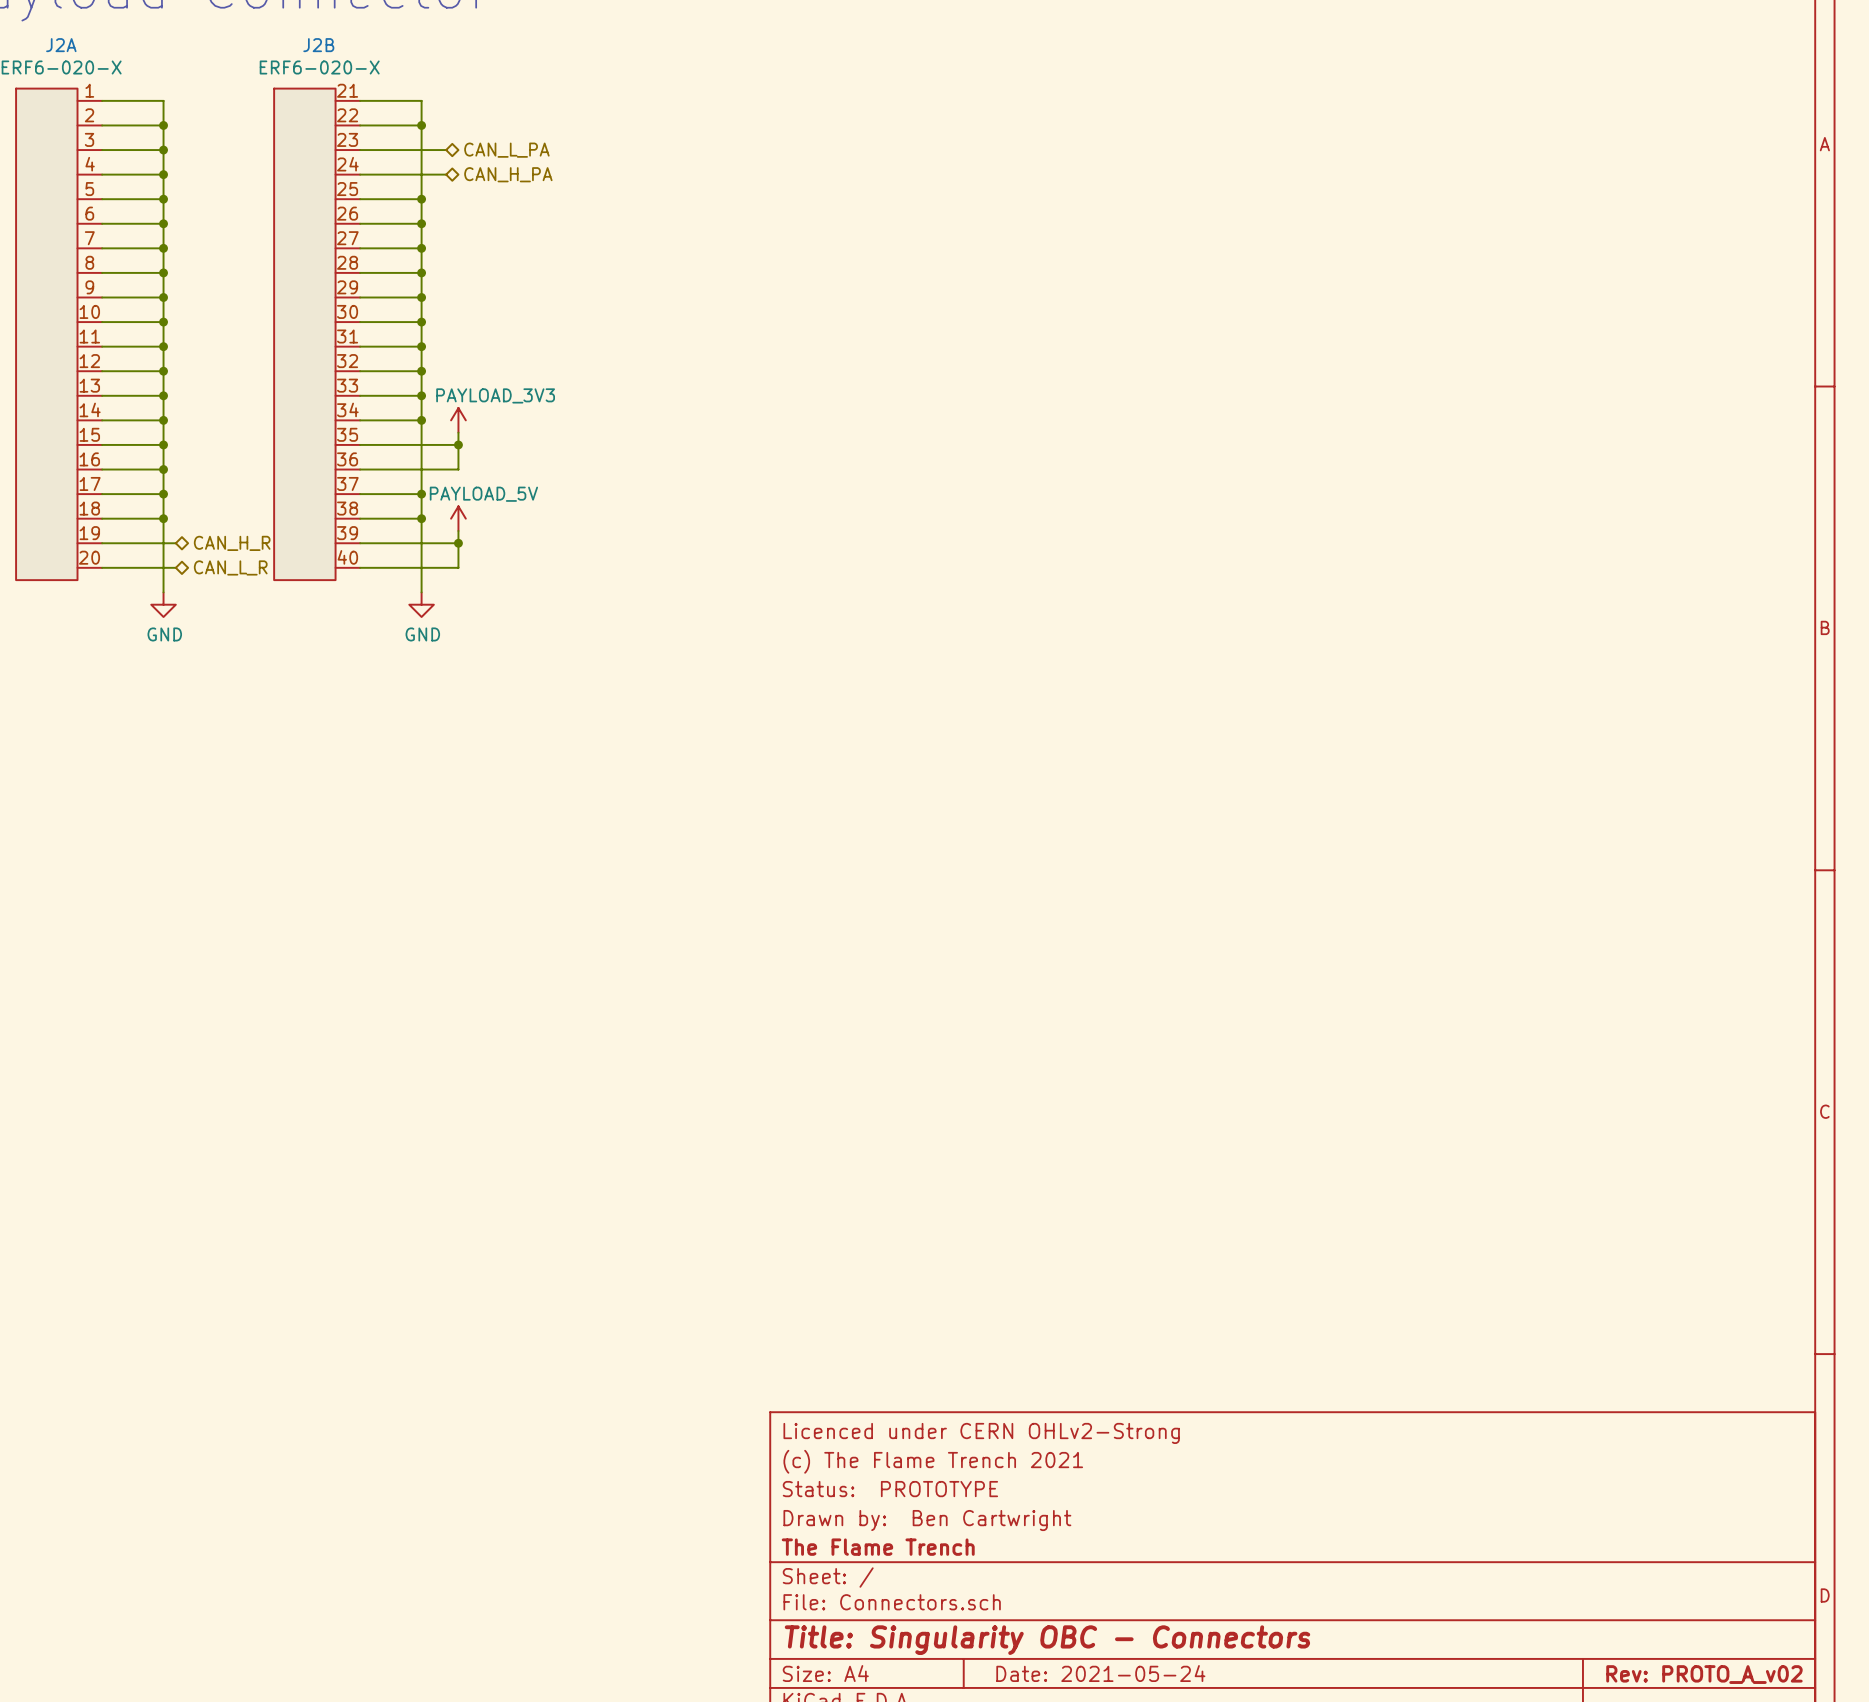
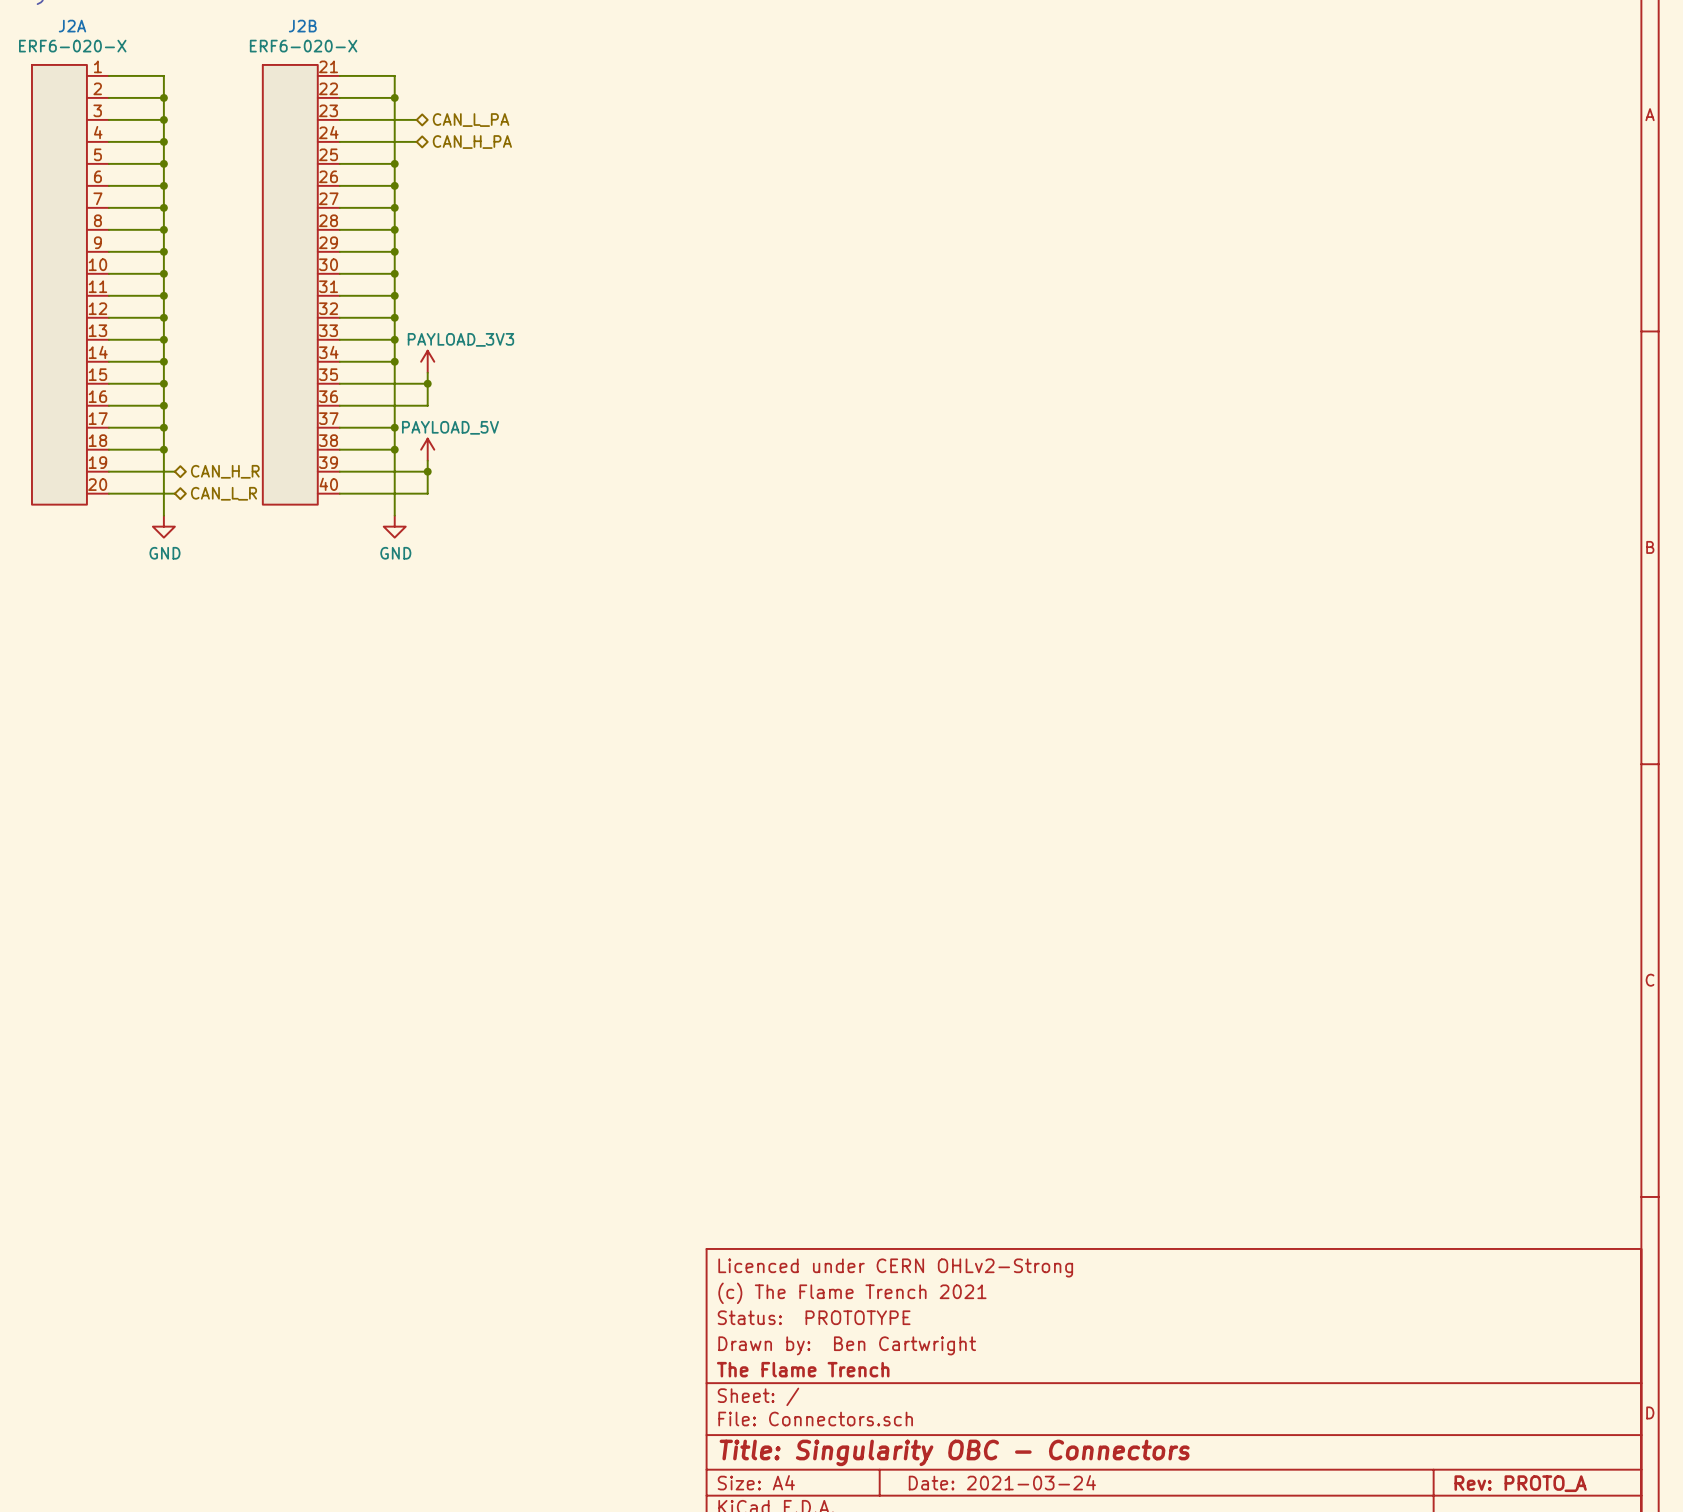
title block: Date: 2021-05-24 (1100, 1673) -> Date: 2021-03-24 (1002, 1482)
title block: Rev: PROTO_A_v02 (1704, 1674) -> Rev: PROTO_A (1520, 1483)

